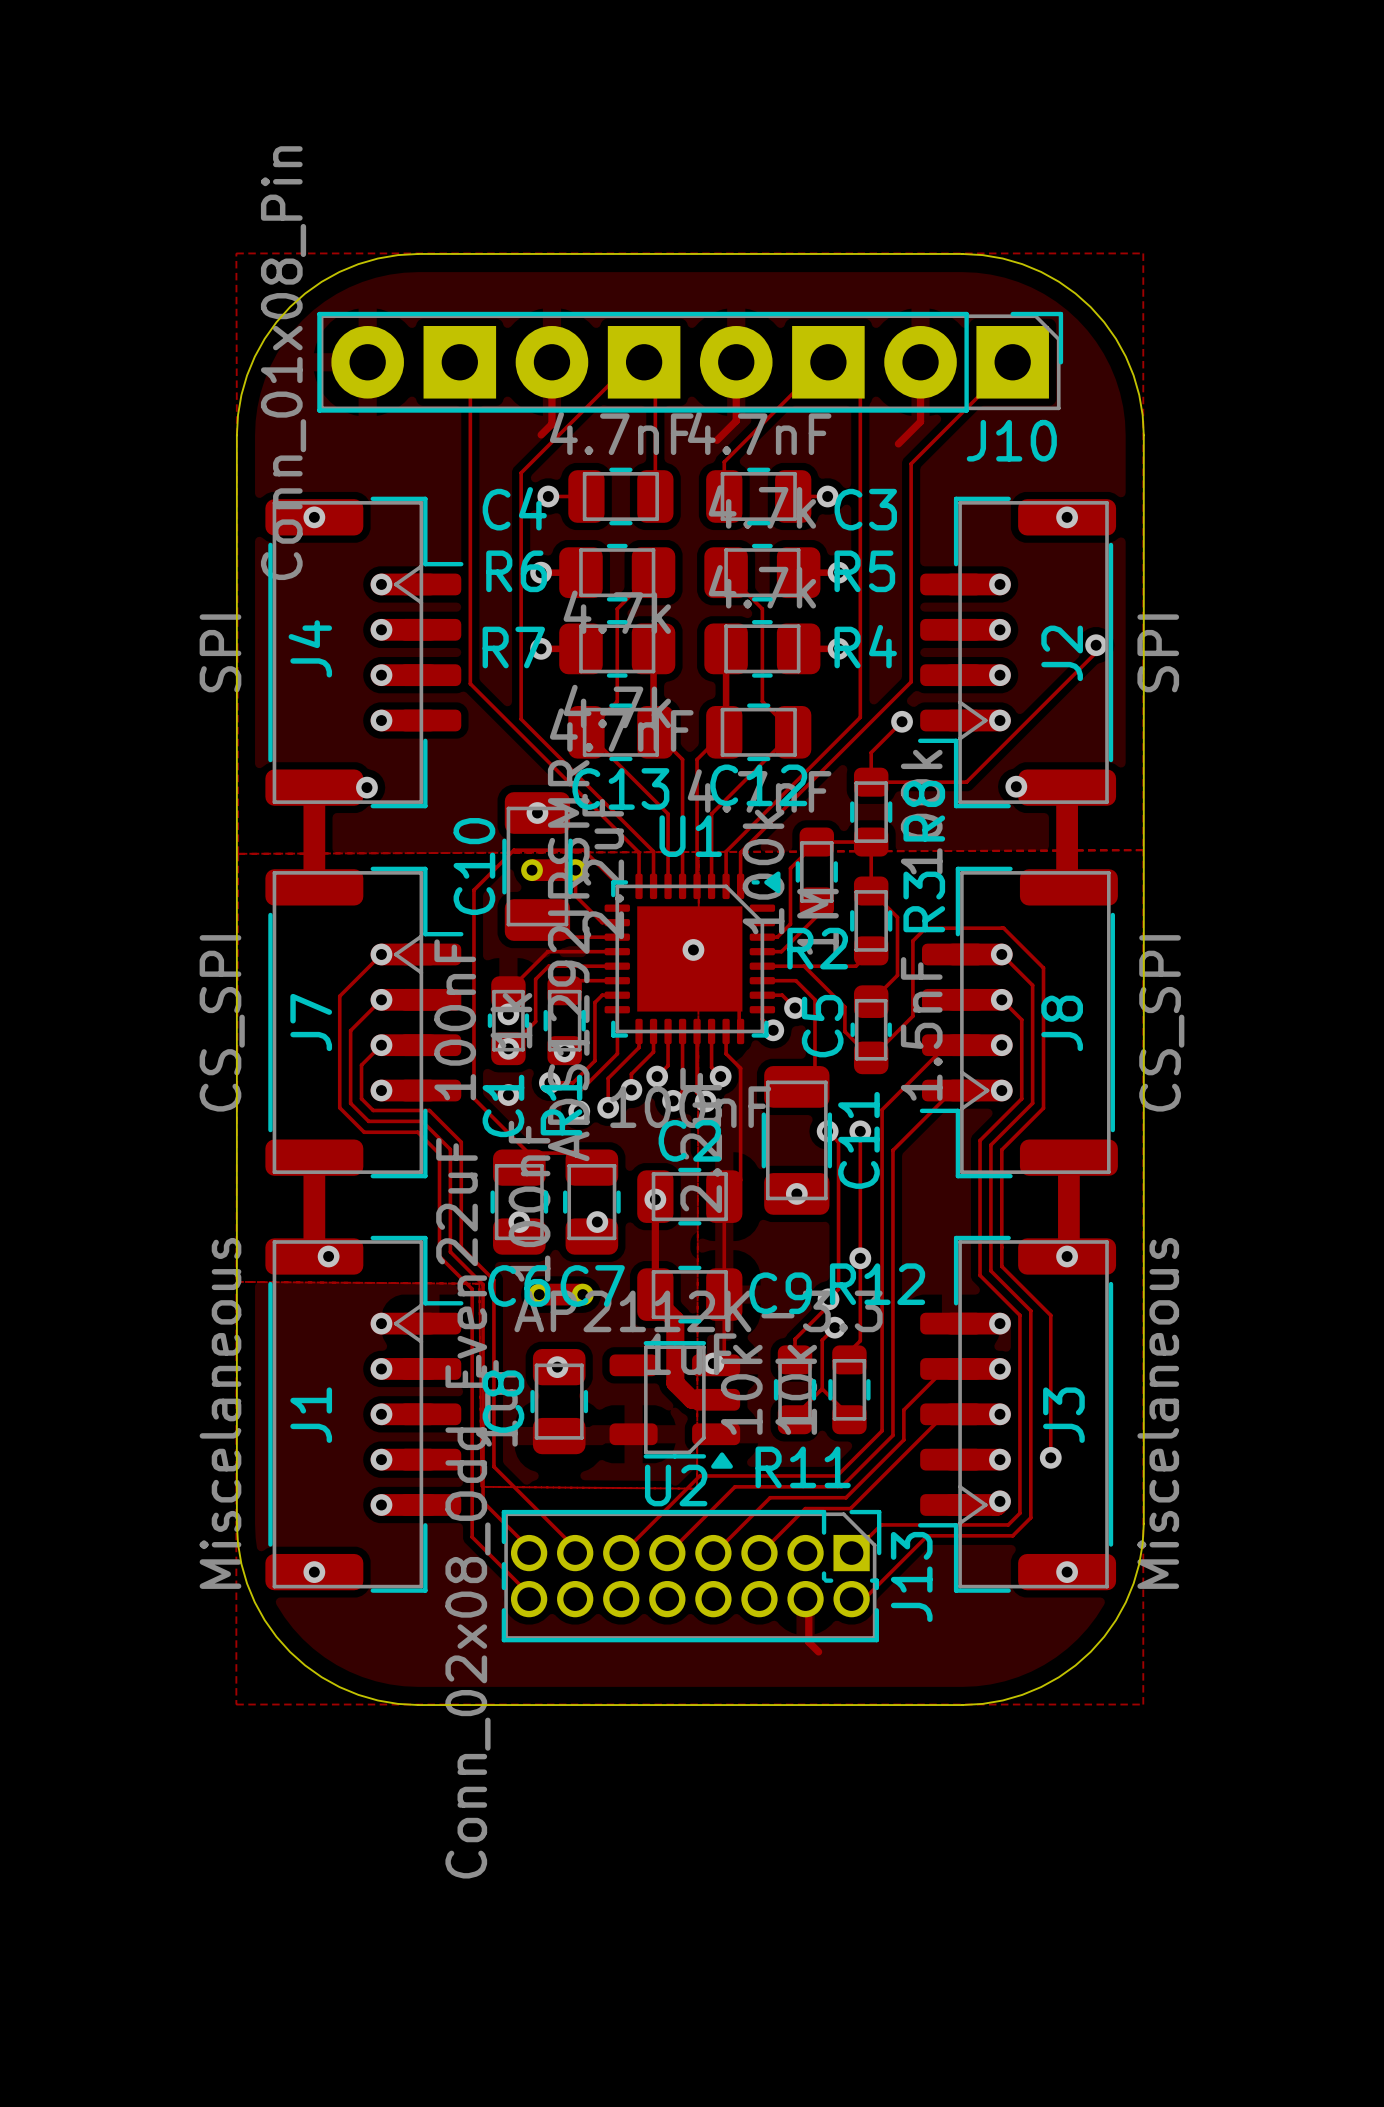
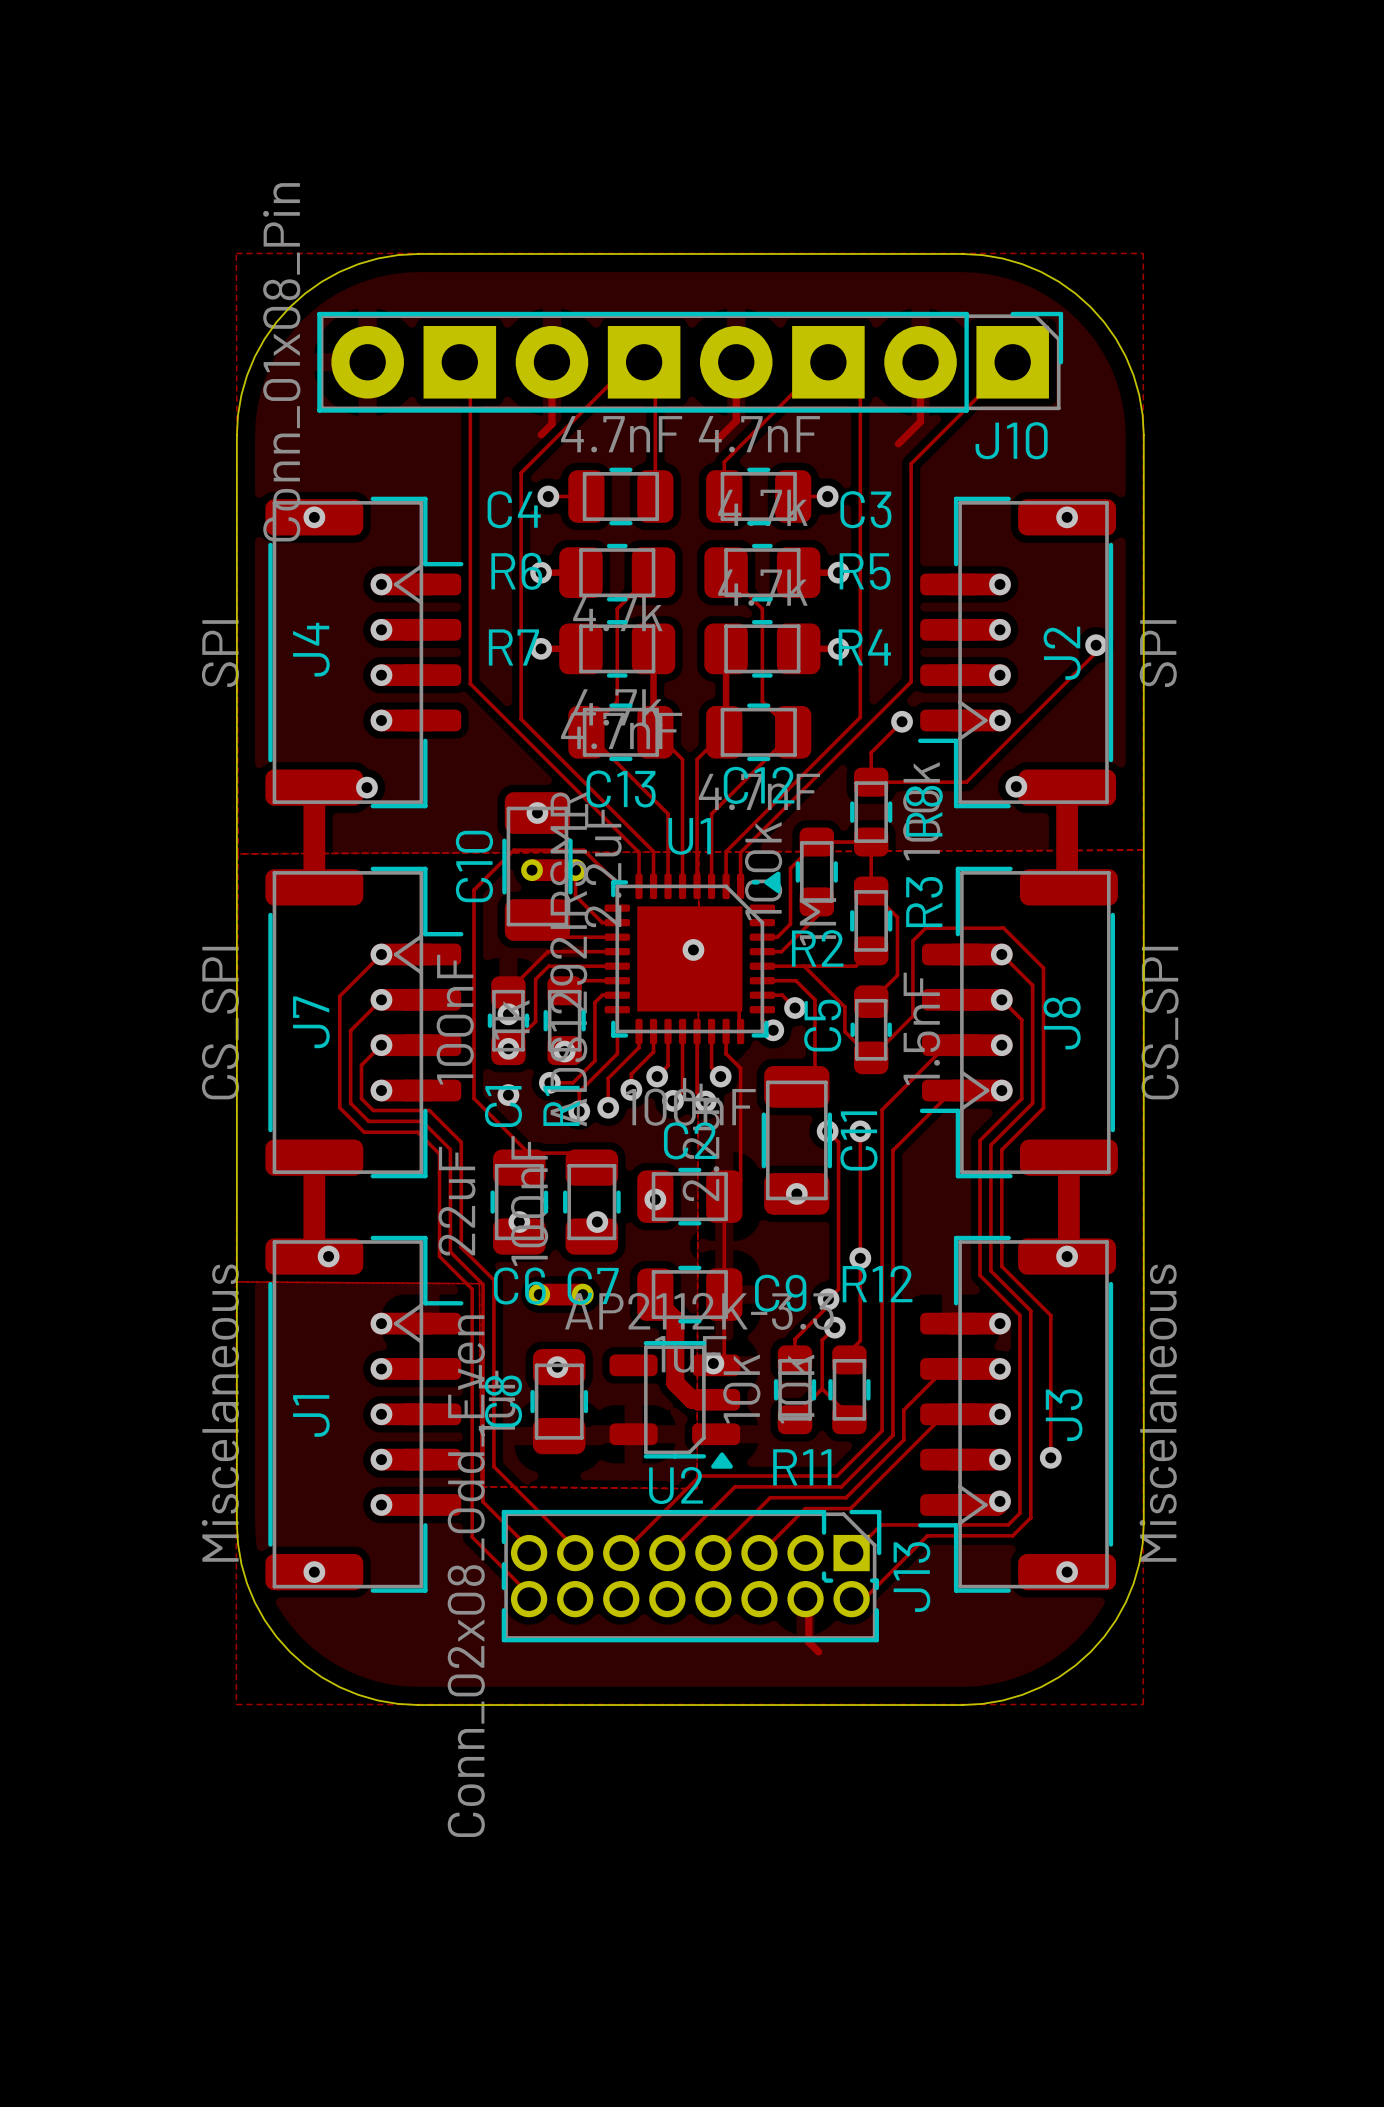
track: (655, 1199) (655, 1294) -> none

